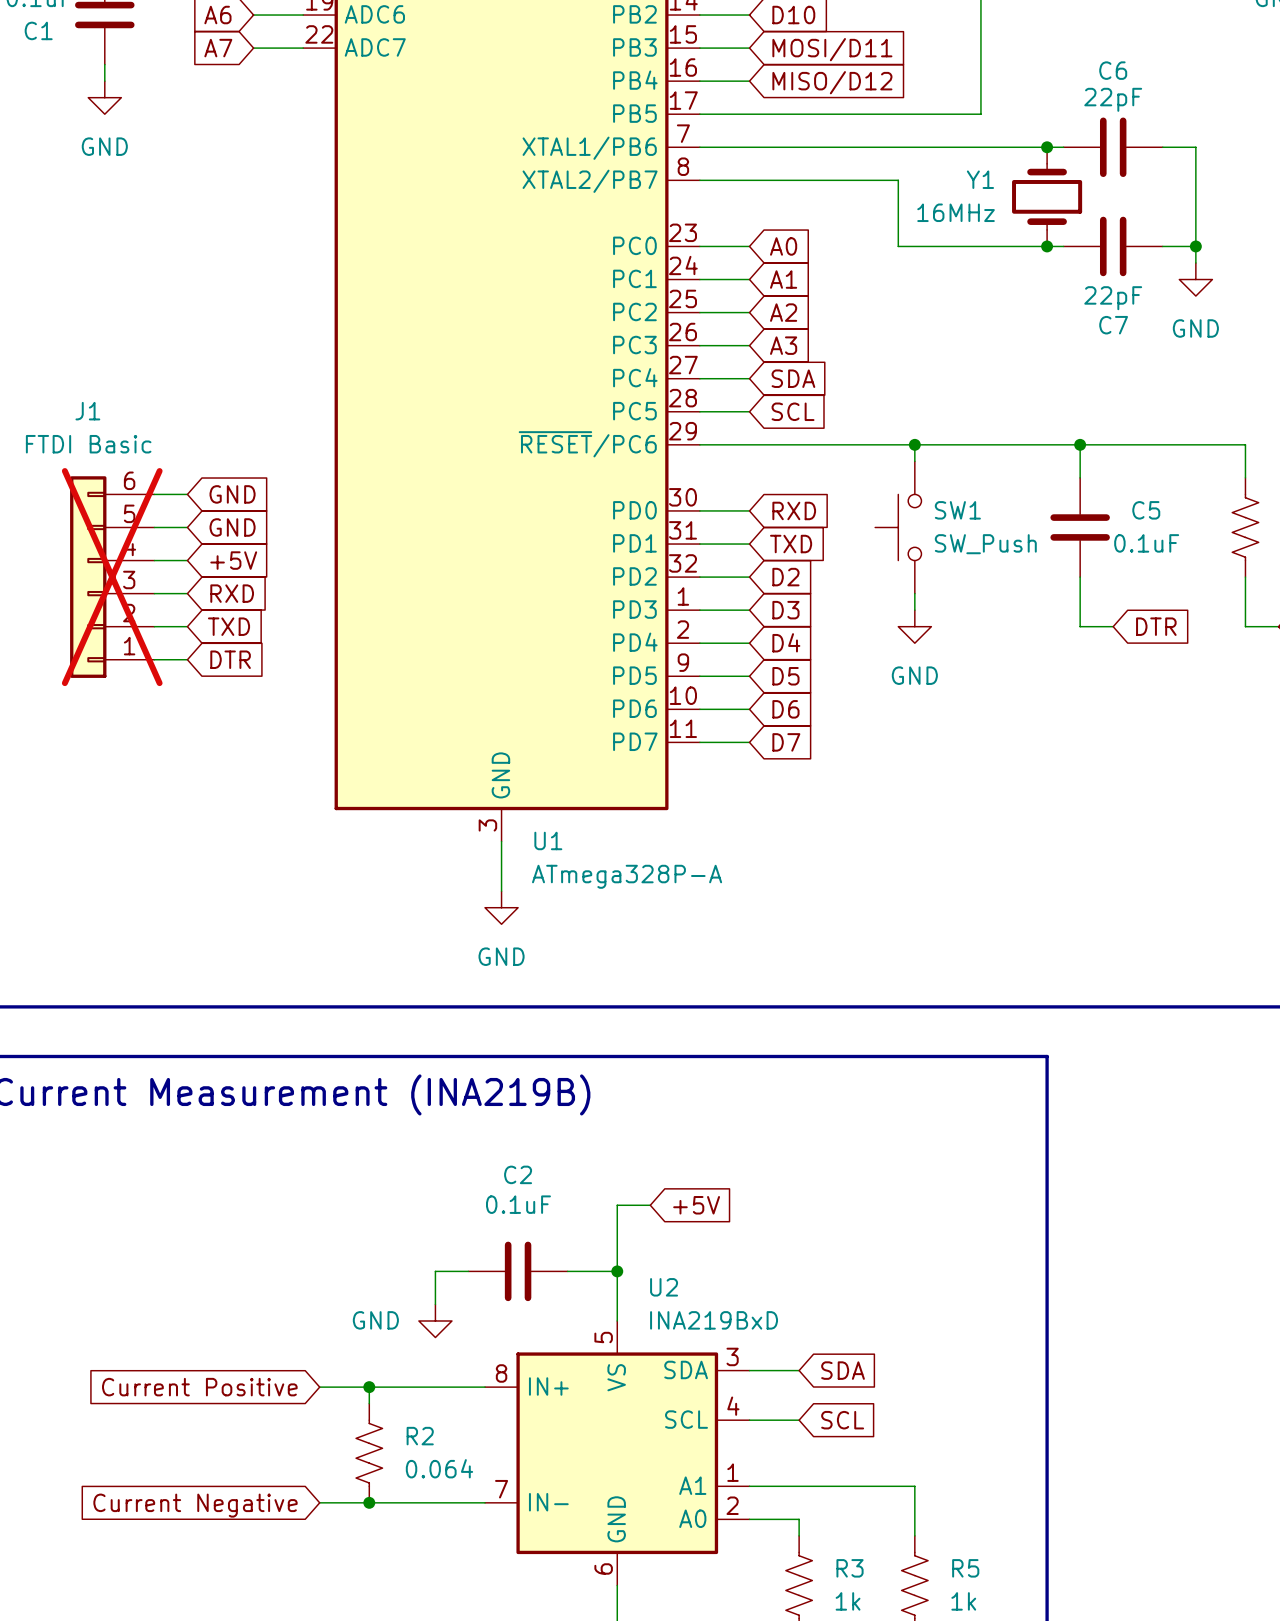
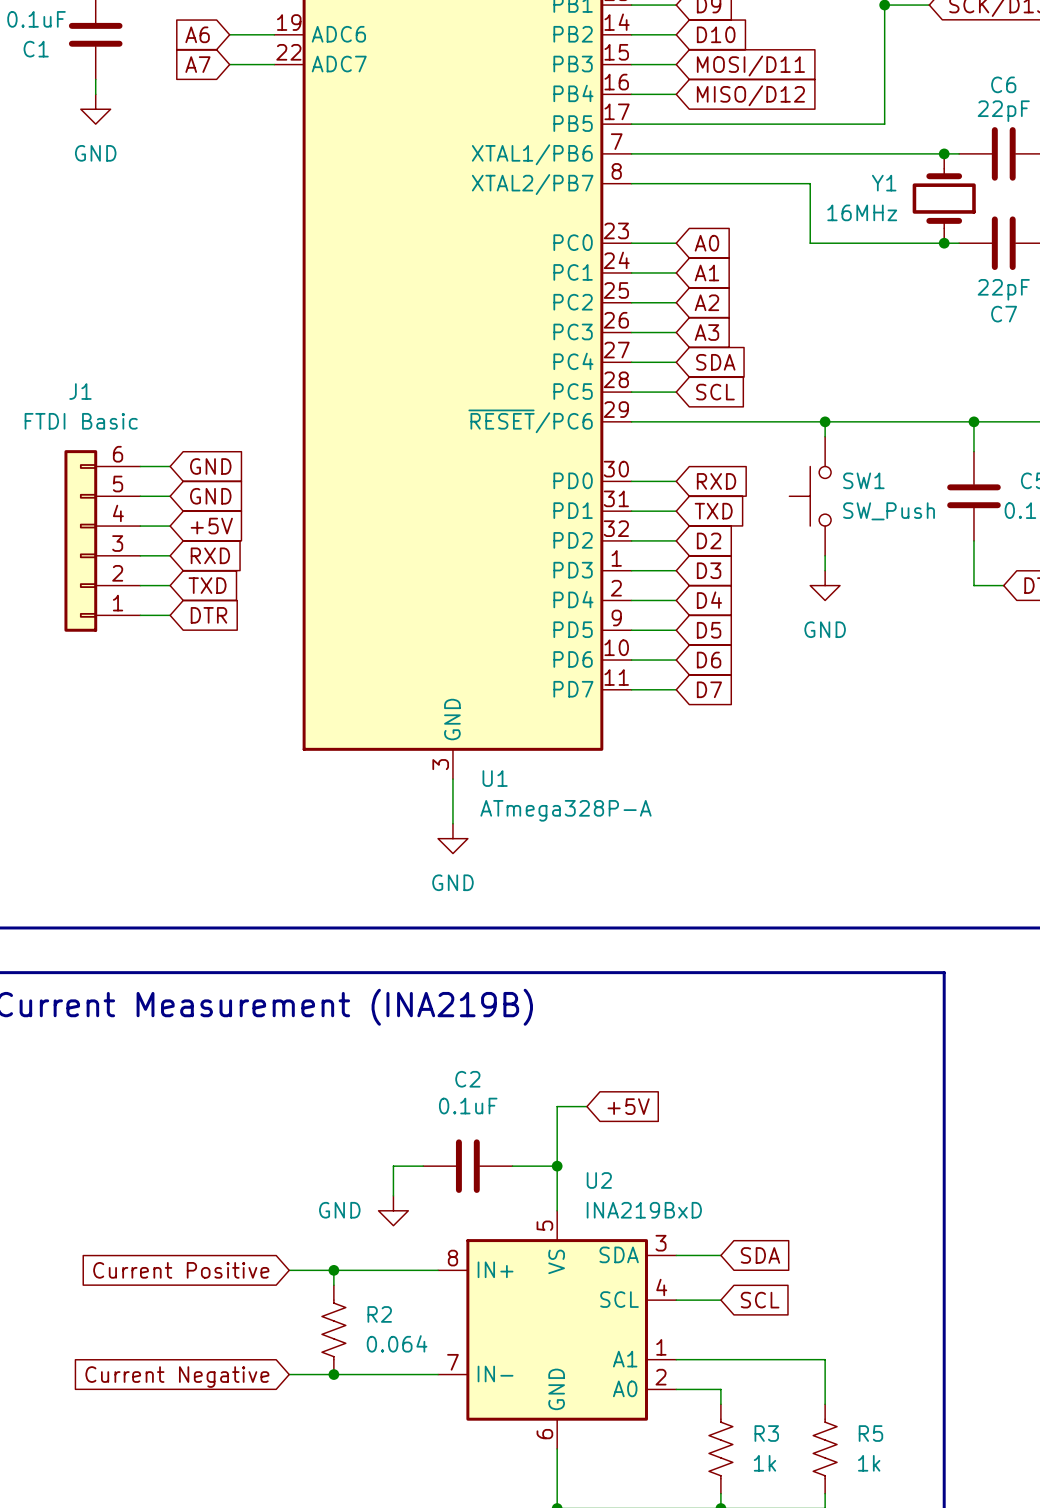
J1 do-not-place cross: (112, 577) -> none

